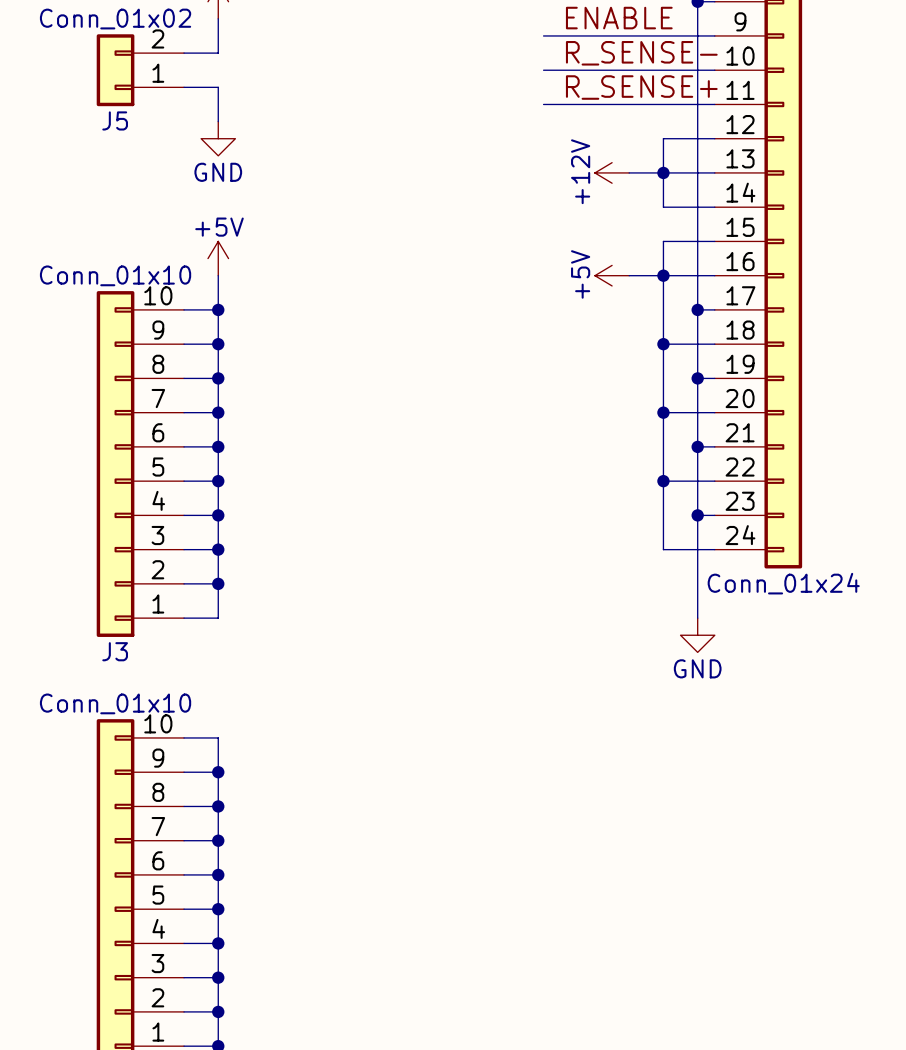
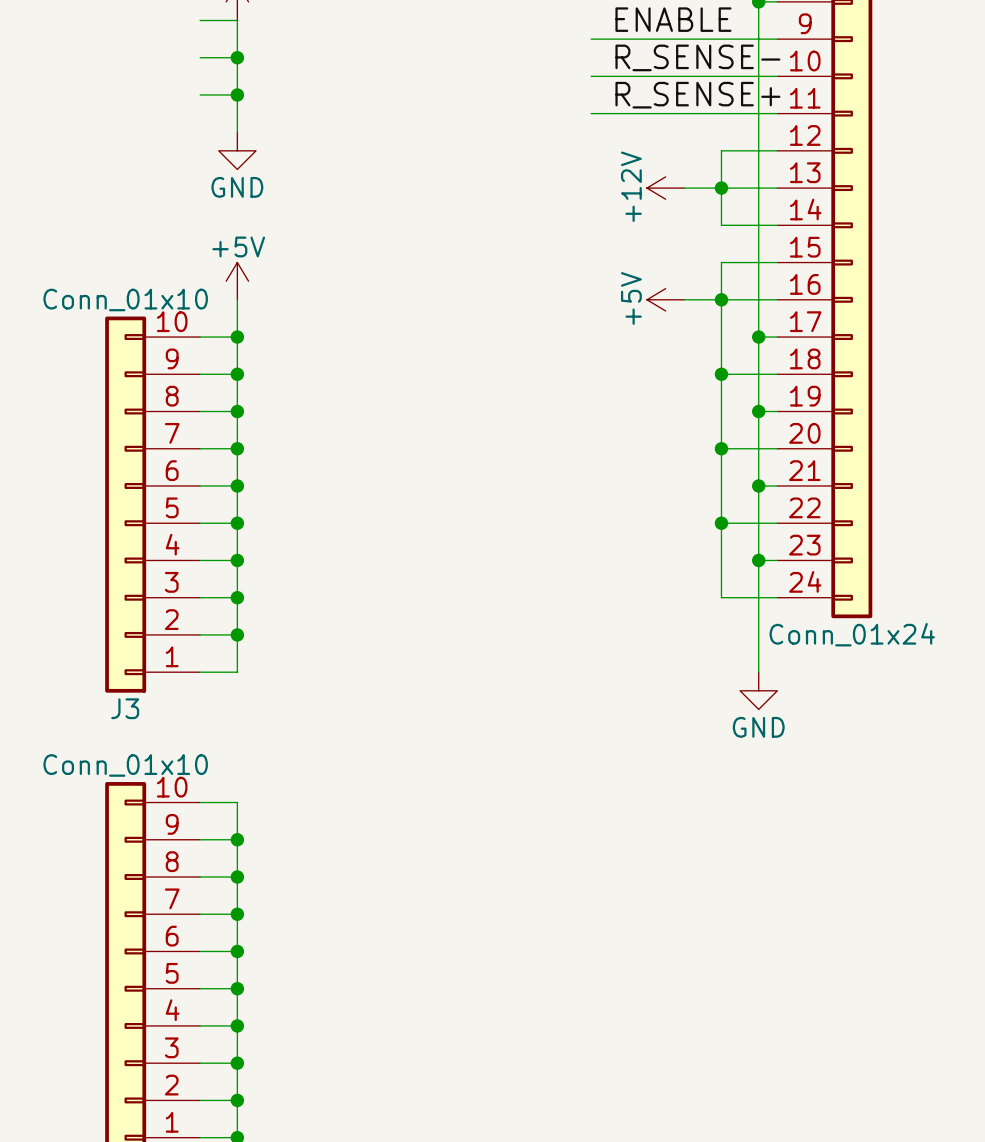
wire: none -> (200, 20) (237, 20)
wire: none -> (237, 57) (237, 94)
junction: none -> (237, 57)
J5: Conn_01x02 (140, 70) -> none
junction: none -> (237, 94)

